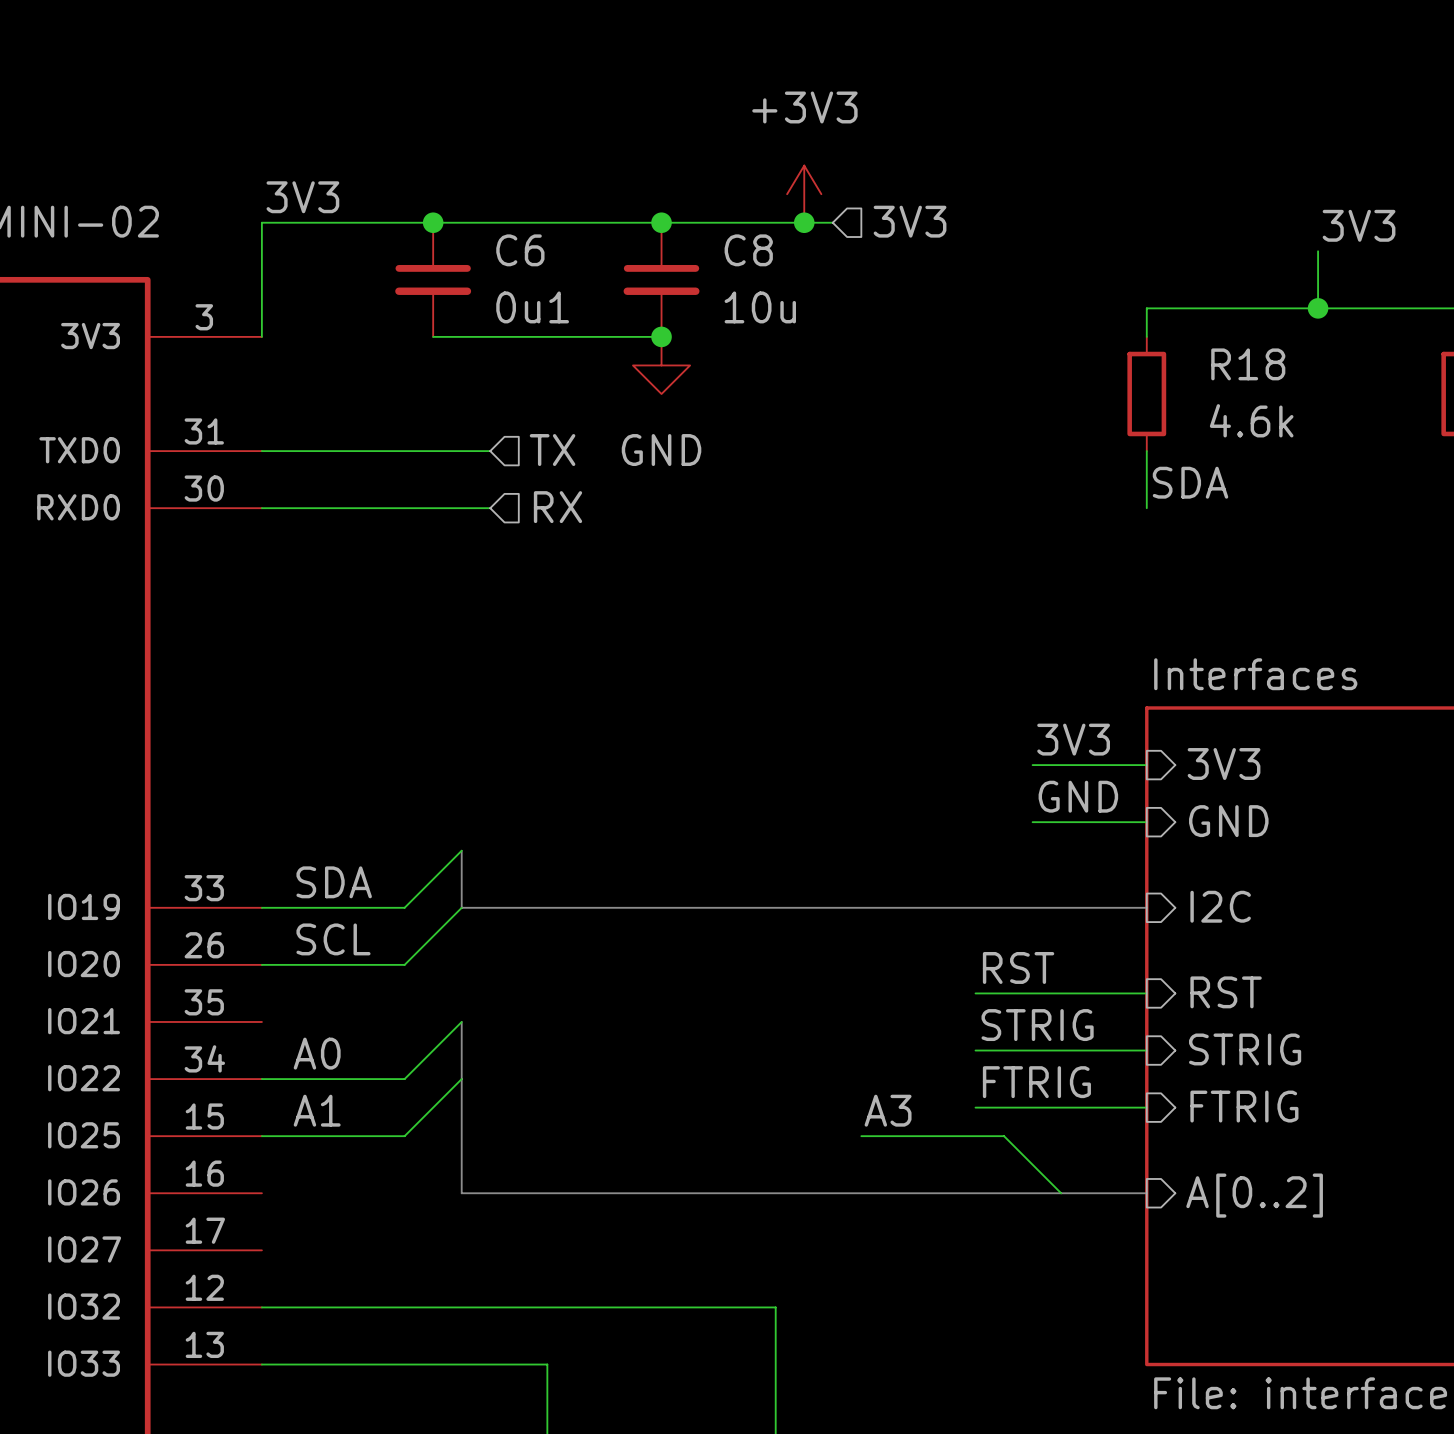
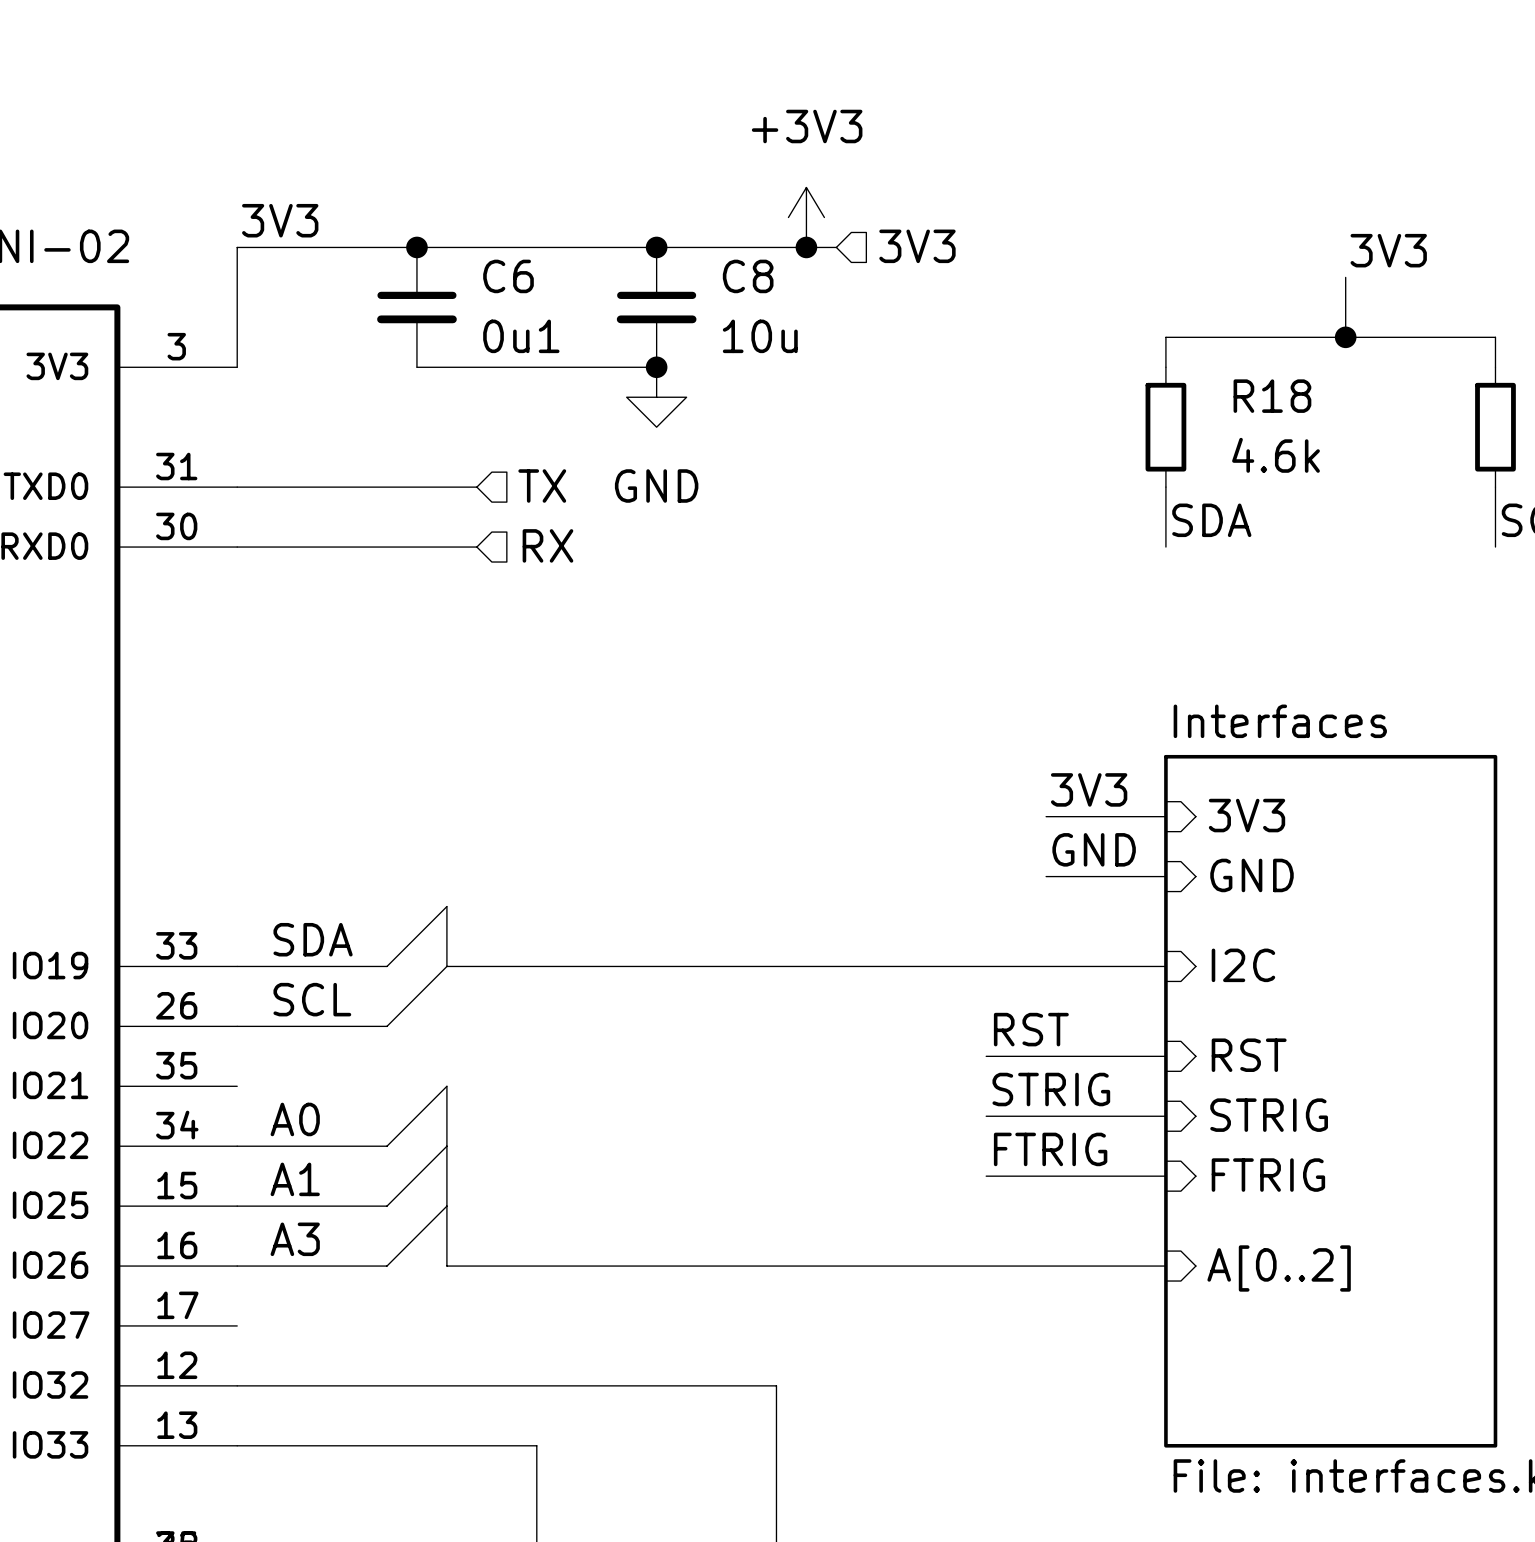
label: A3 (888, 1110) -> none
wire: none -> (446, 1206) (387, 1266) (237, 1266)
wire: (861, 1136) (1004, 1136) (1061, 1193) -> none
label: none -> A3 (295, 1239)

